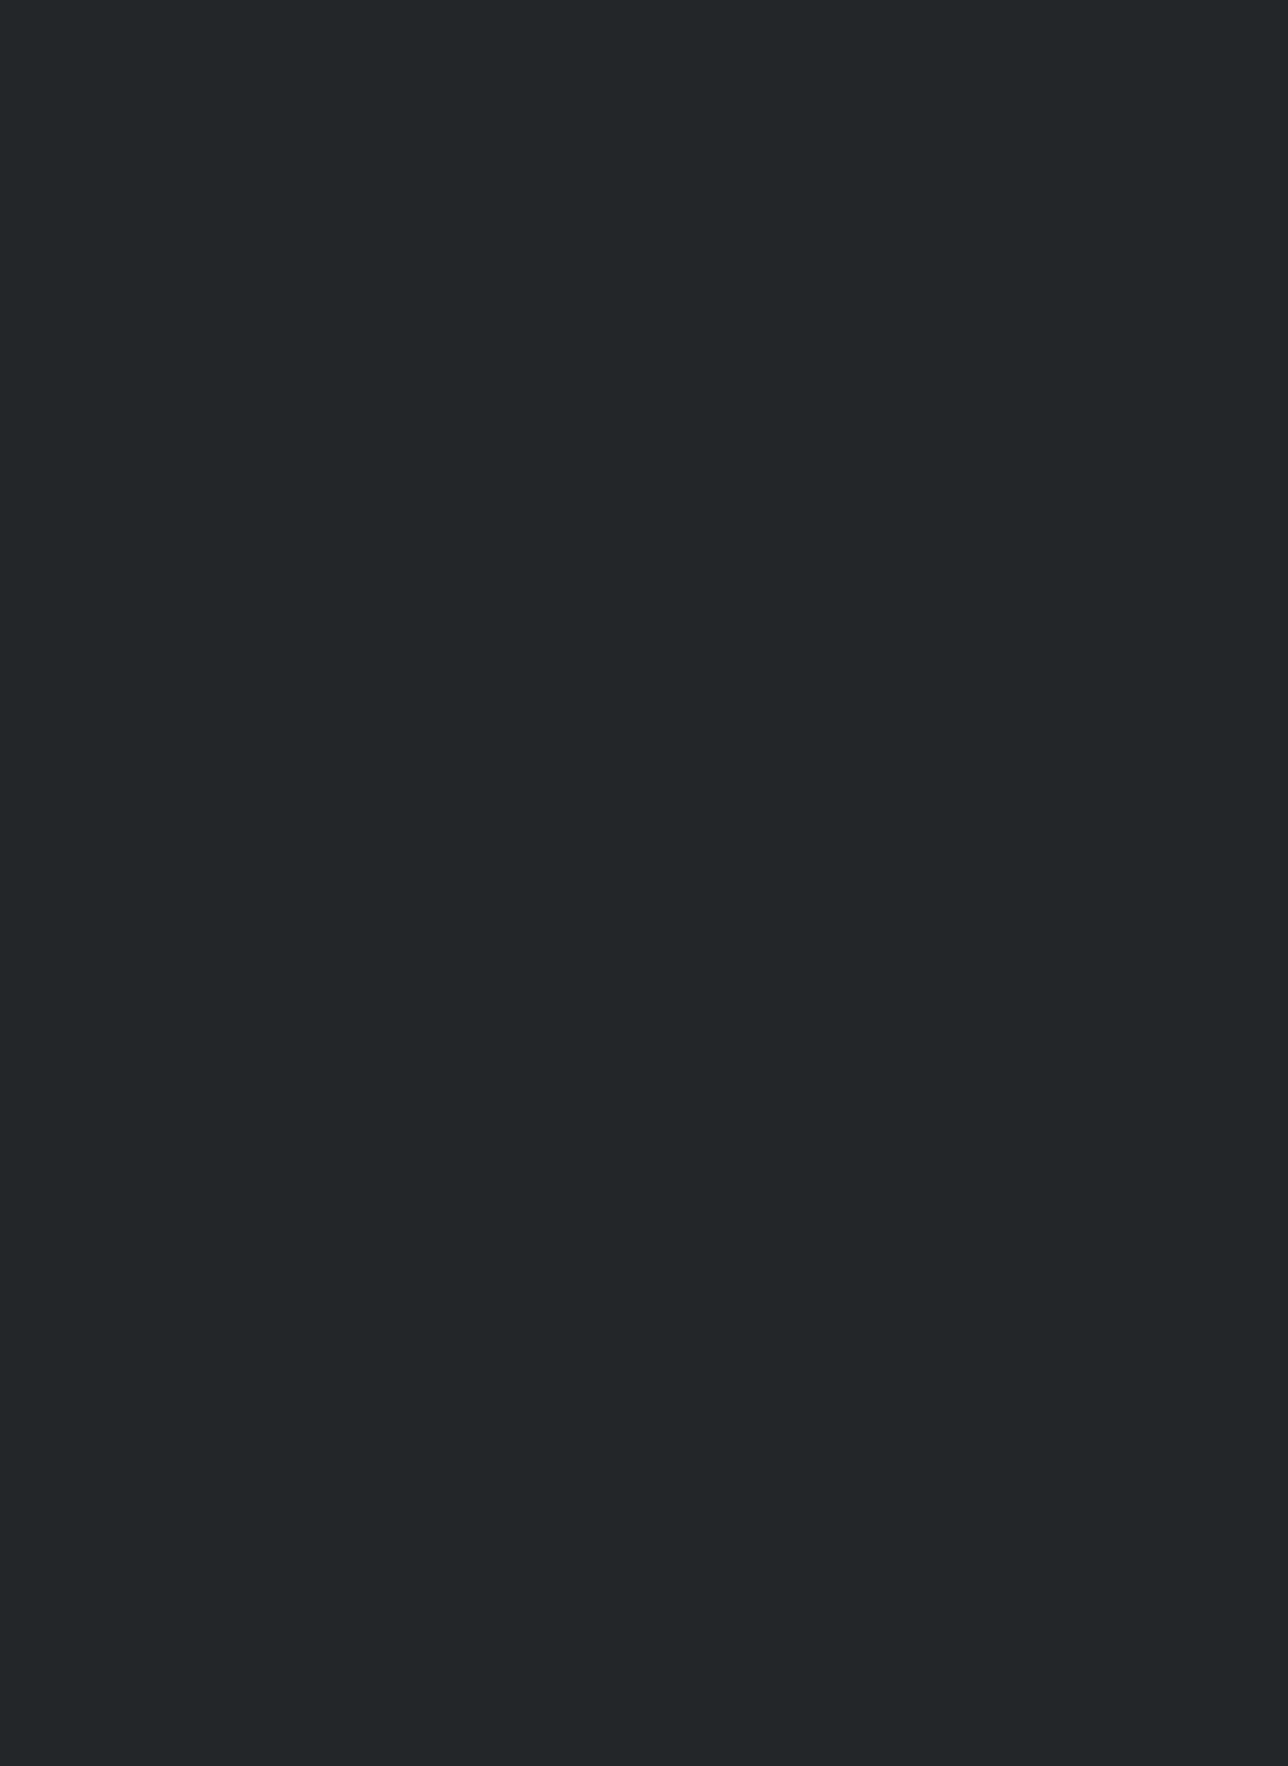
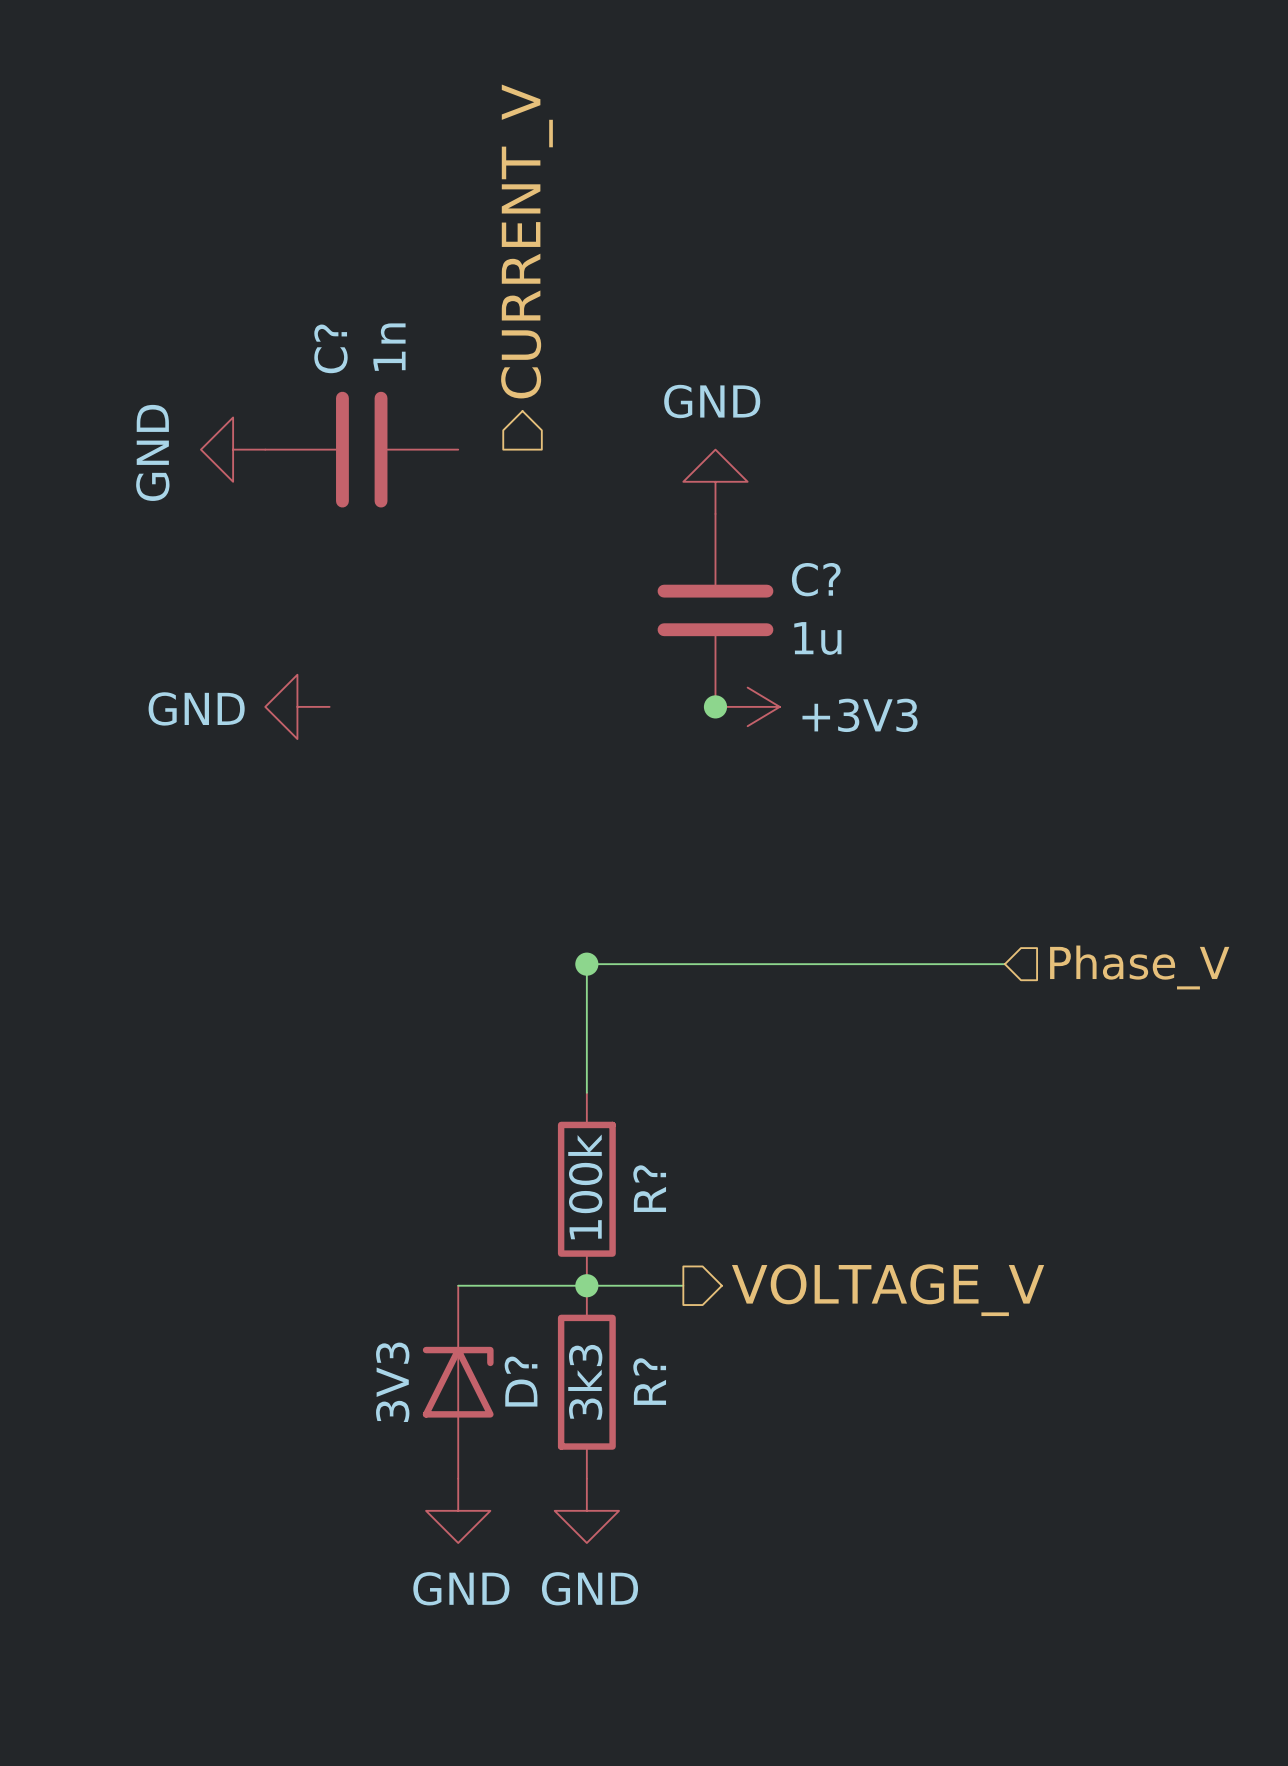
hierarchical label: none -> CURRENT_V (526, 241)
power symbol: none -> GND (233, 449)
C?: none -> 1n (361, 449)
power symbol: none -> GND (715, 481)
C?: none -> 1u (715, 610)
power symbol: none -> GND (297, 706)
junction: none -> (715, 706)
power symbol: none -> +3V3 (747, 706)
junction: none -> (586, 964)
wire: none -> (1004, 964) (586, 964) (586, 1092)
hierarchical label: none -> Phase_V (1139, 967)
R?: none -> 100k (586, 1189)
wire: none -> (458, 1285) (683, 1285)
junction: none -> (586, 1285)
hierarchical label: none -> VOLTAGE_V (888, 1290)
D?: none -> 3V3 (458, 1382)
R?: none -> 3k3 (586, 1382)
power symbol: none -> GND (458, 1510)
power symbol: none -> GND (586, 1510)

